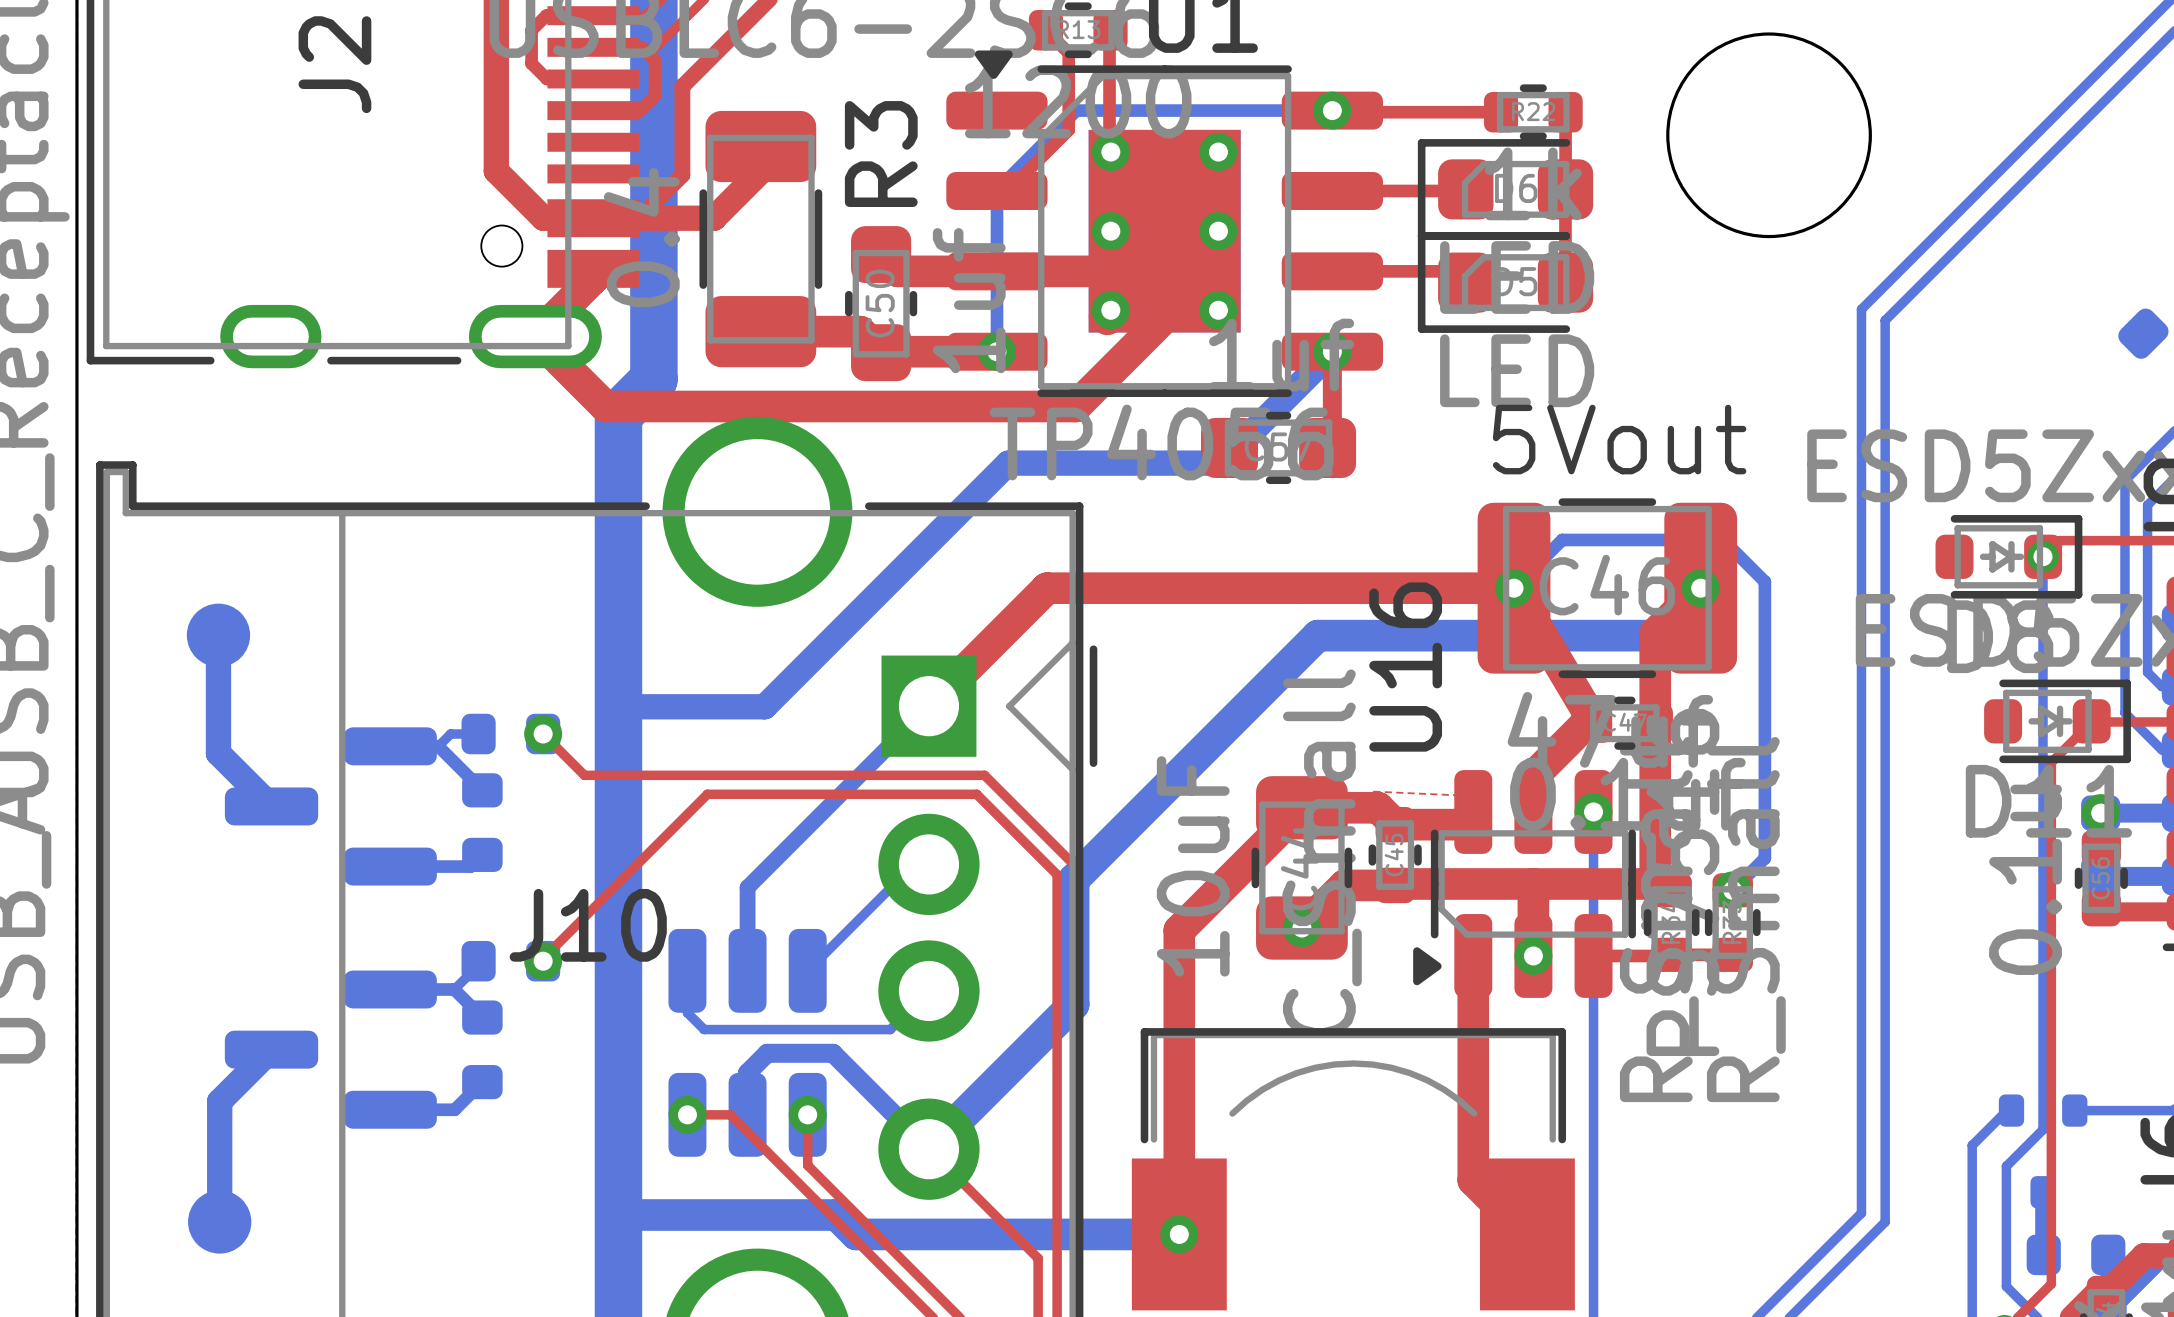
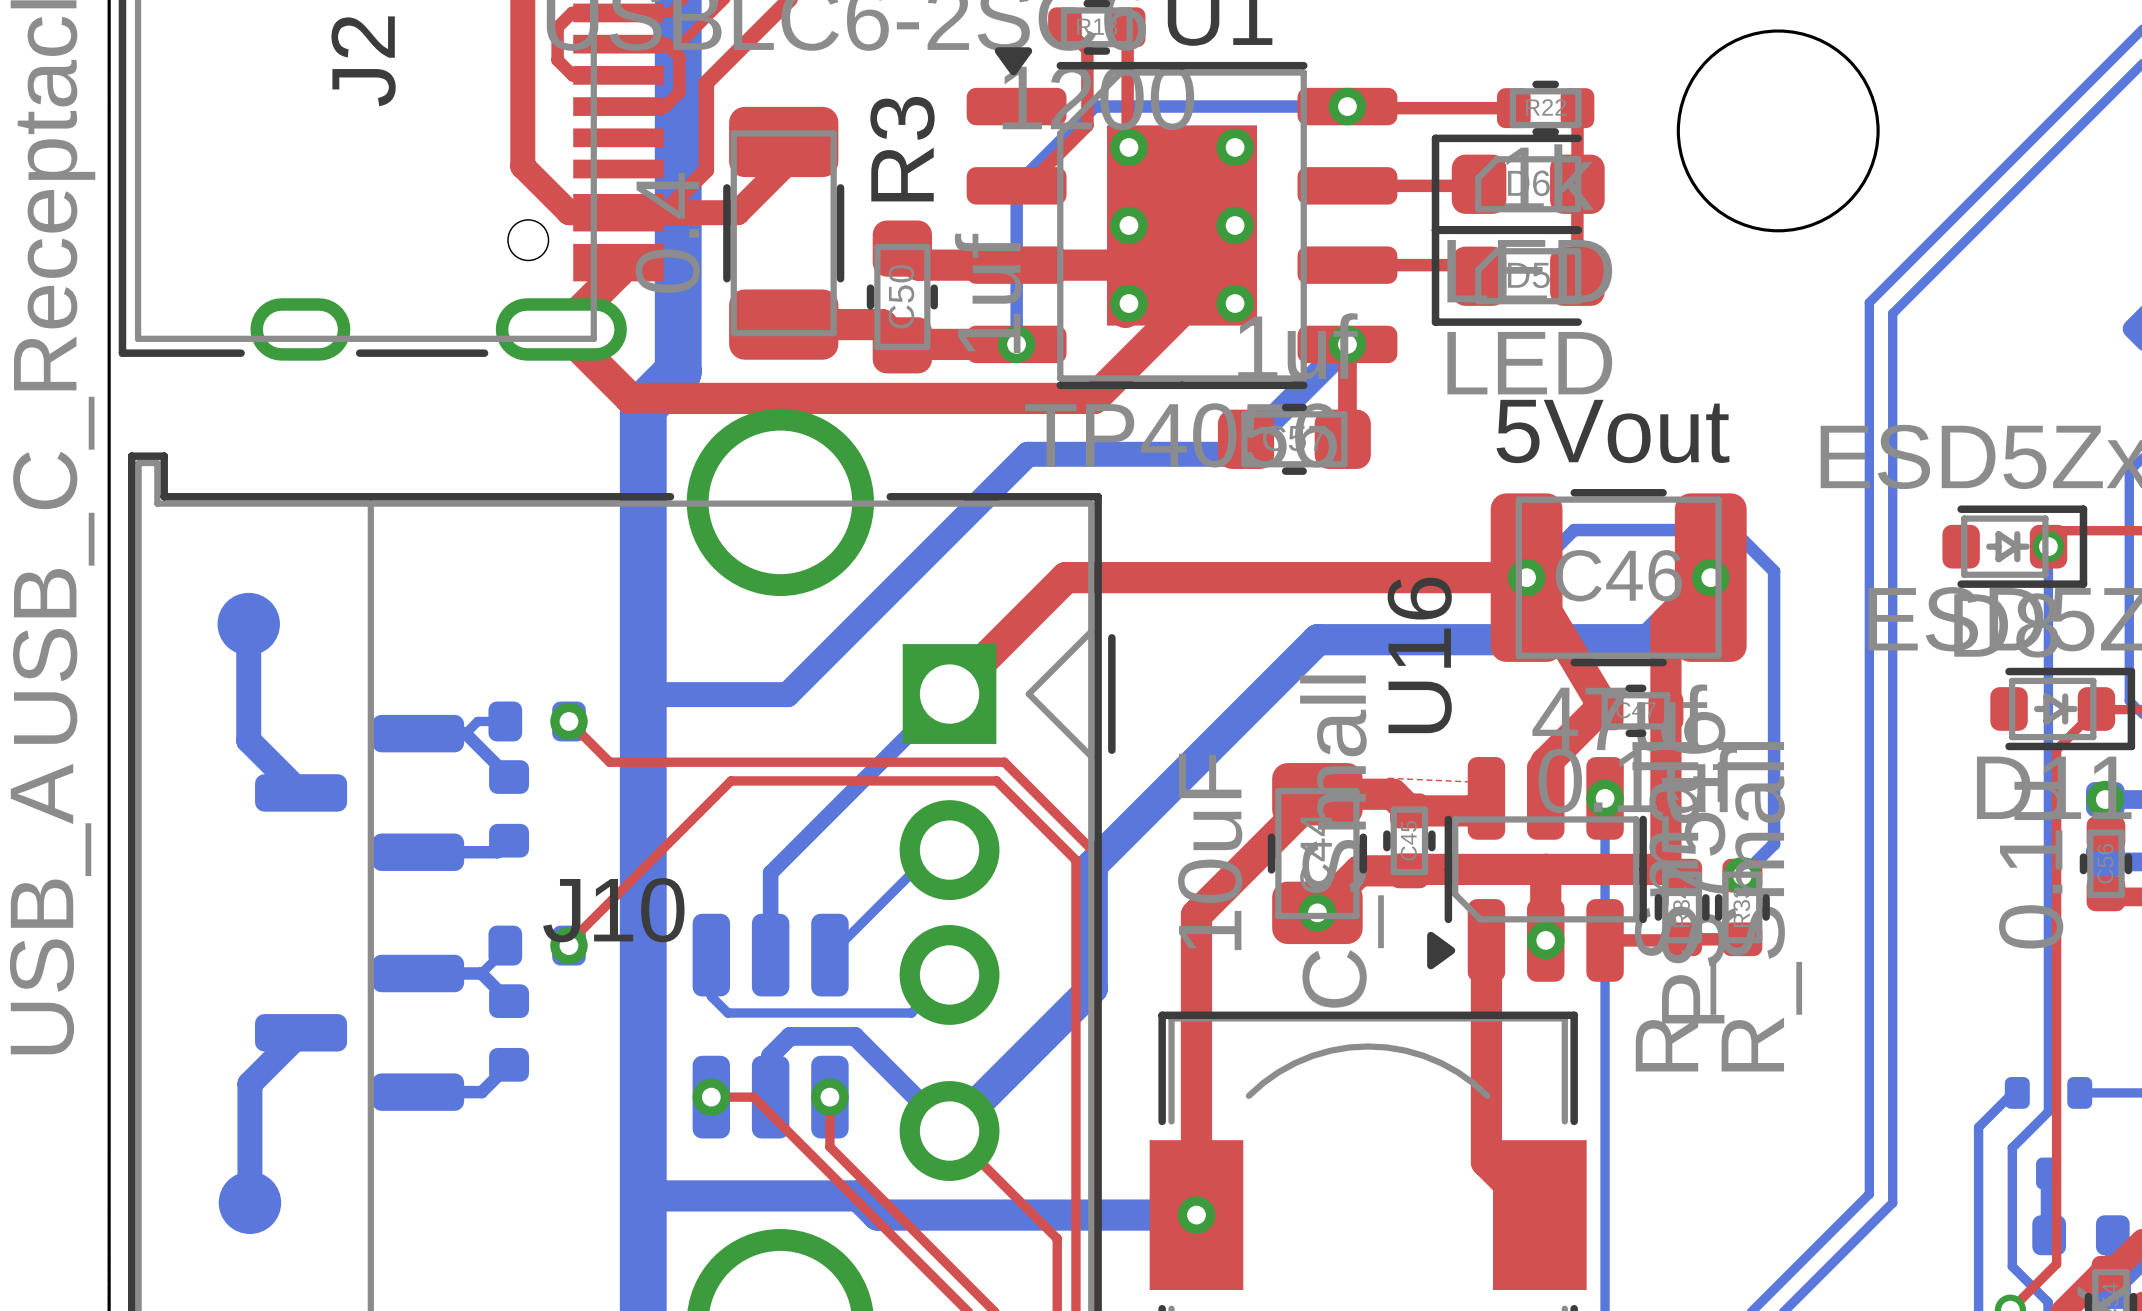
bottom track: (1653, 635) (1317, 635) (1302, 651) -> (1663, 624) (1648, 639) (1317, 639)

